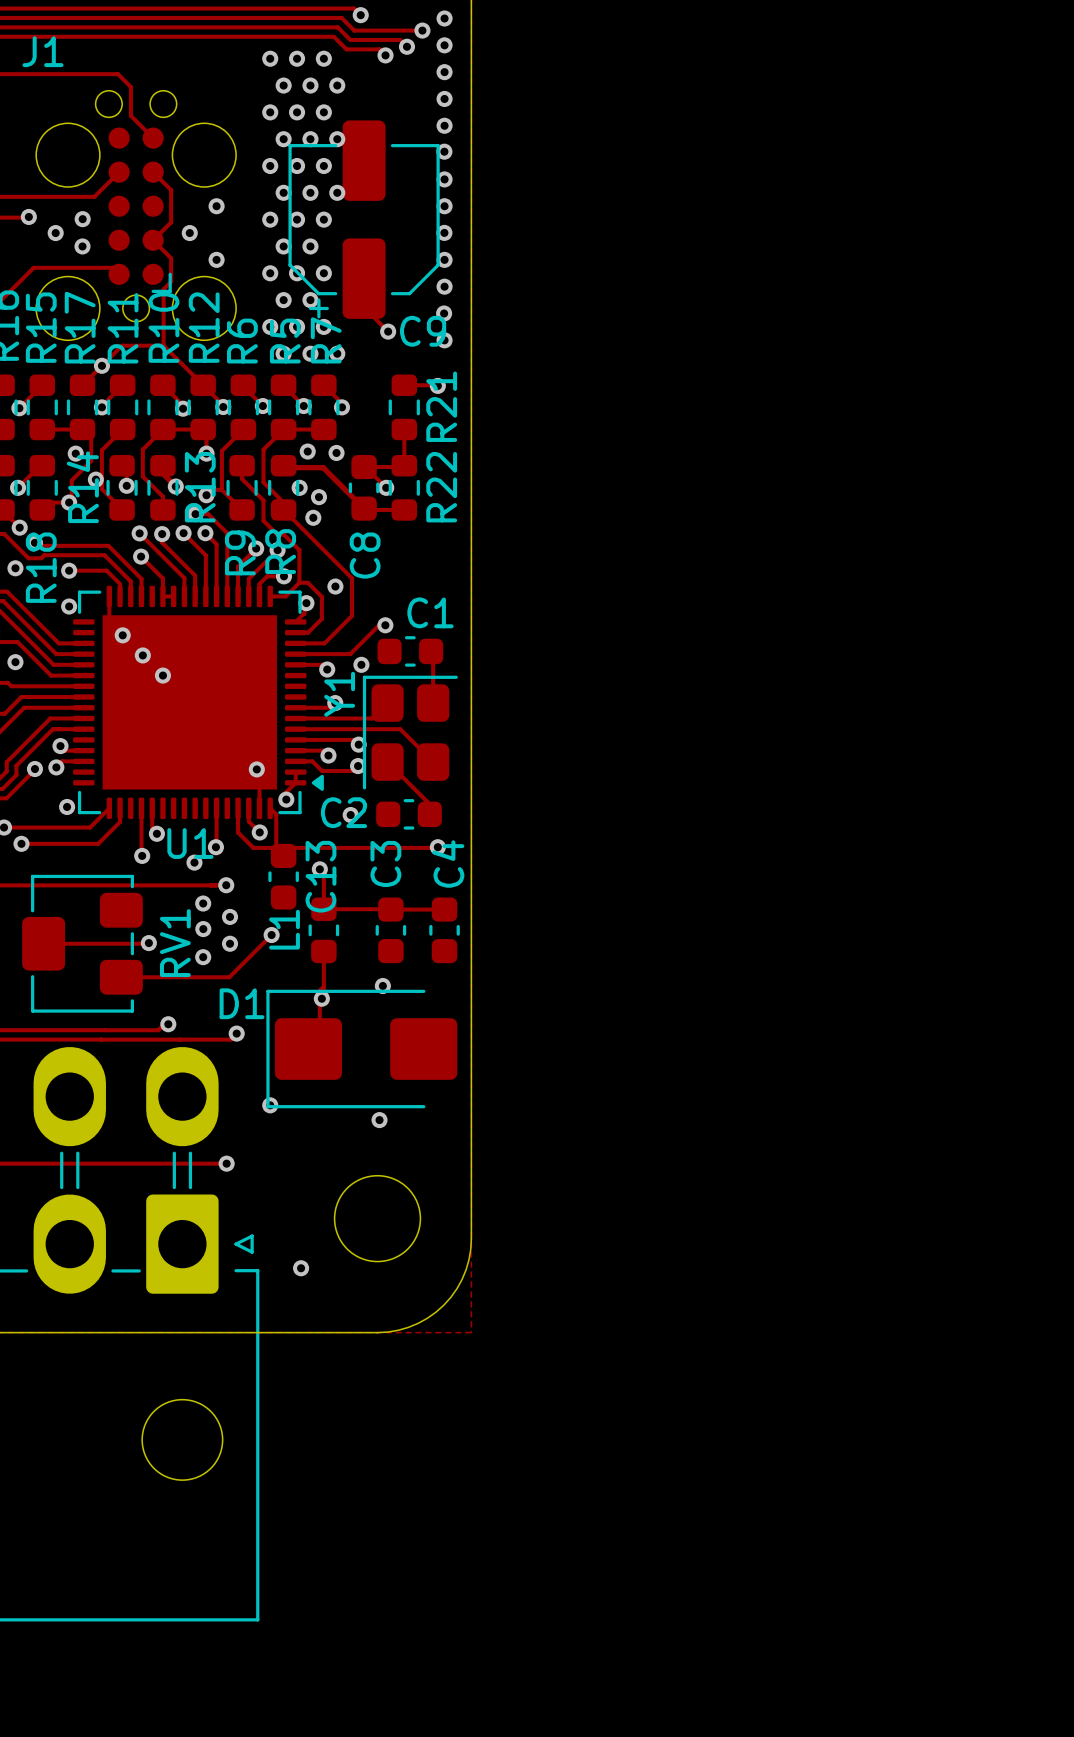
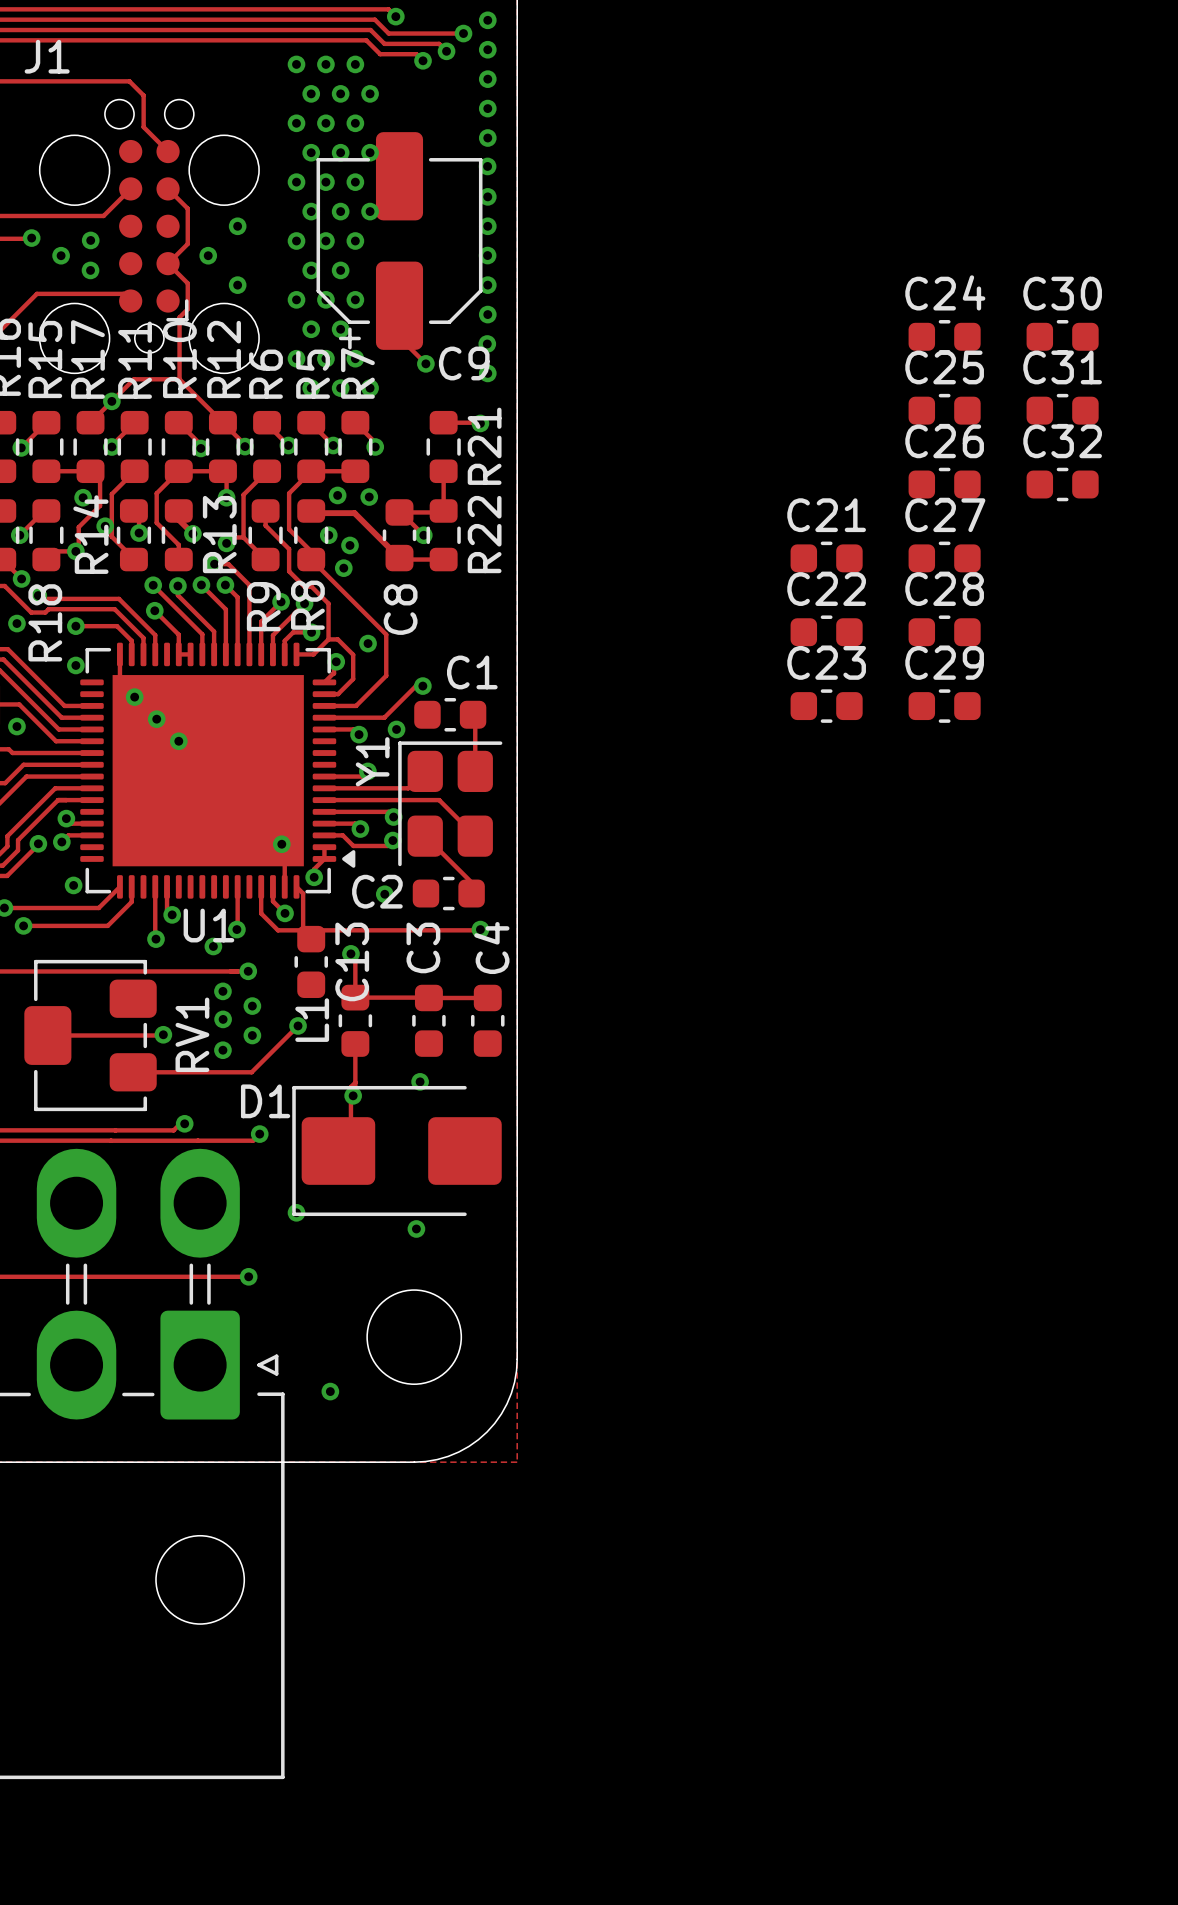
C24: none -> (944, 336)
C30: none -> (1062, 336)
C25: none -> (944, 410)
C31: none -> (1062, 410)
C26: none -> (944, 484)
C32: none -> (1062, 484)
C21: none -> (826, 558)
C27: none -> (944, 558)
C22: none -> (826, 632)
C28: none -> (944, 632)
C23: none -> (826, 706)
C29: none -> (944, 706)

